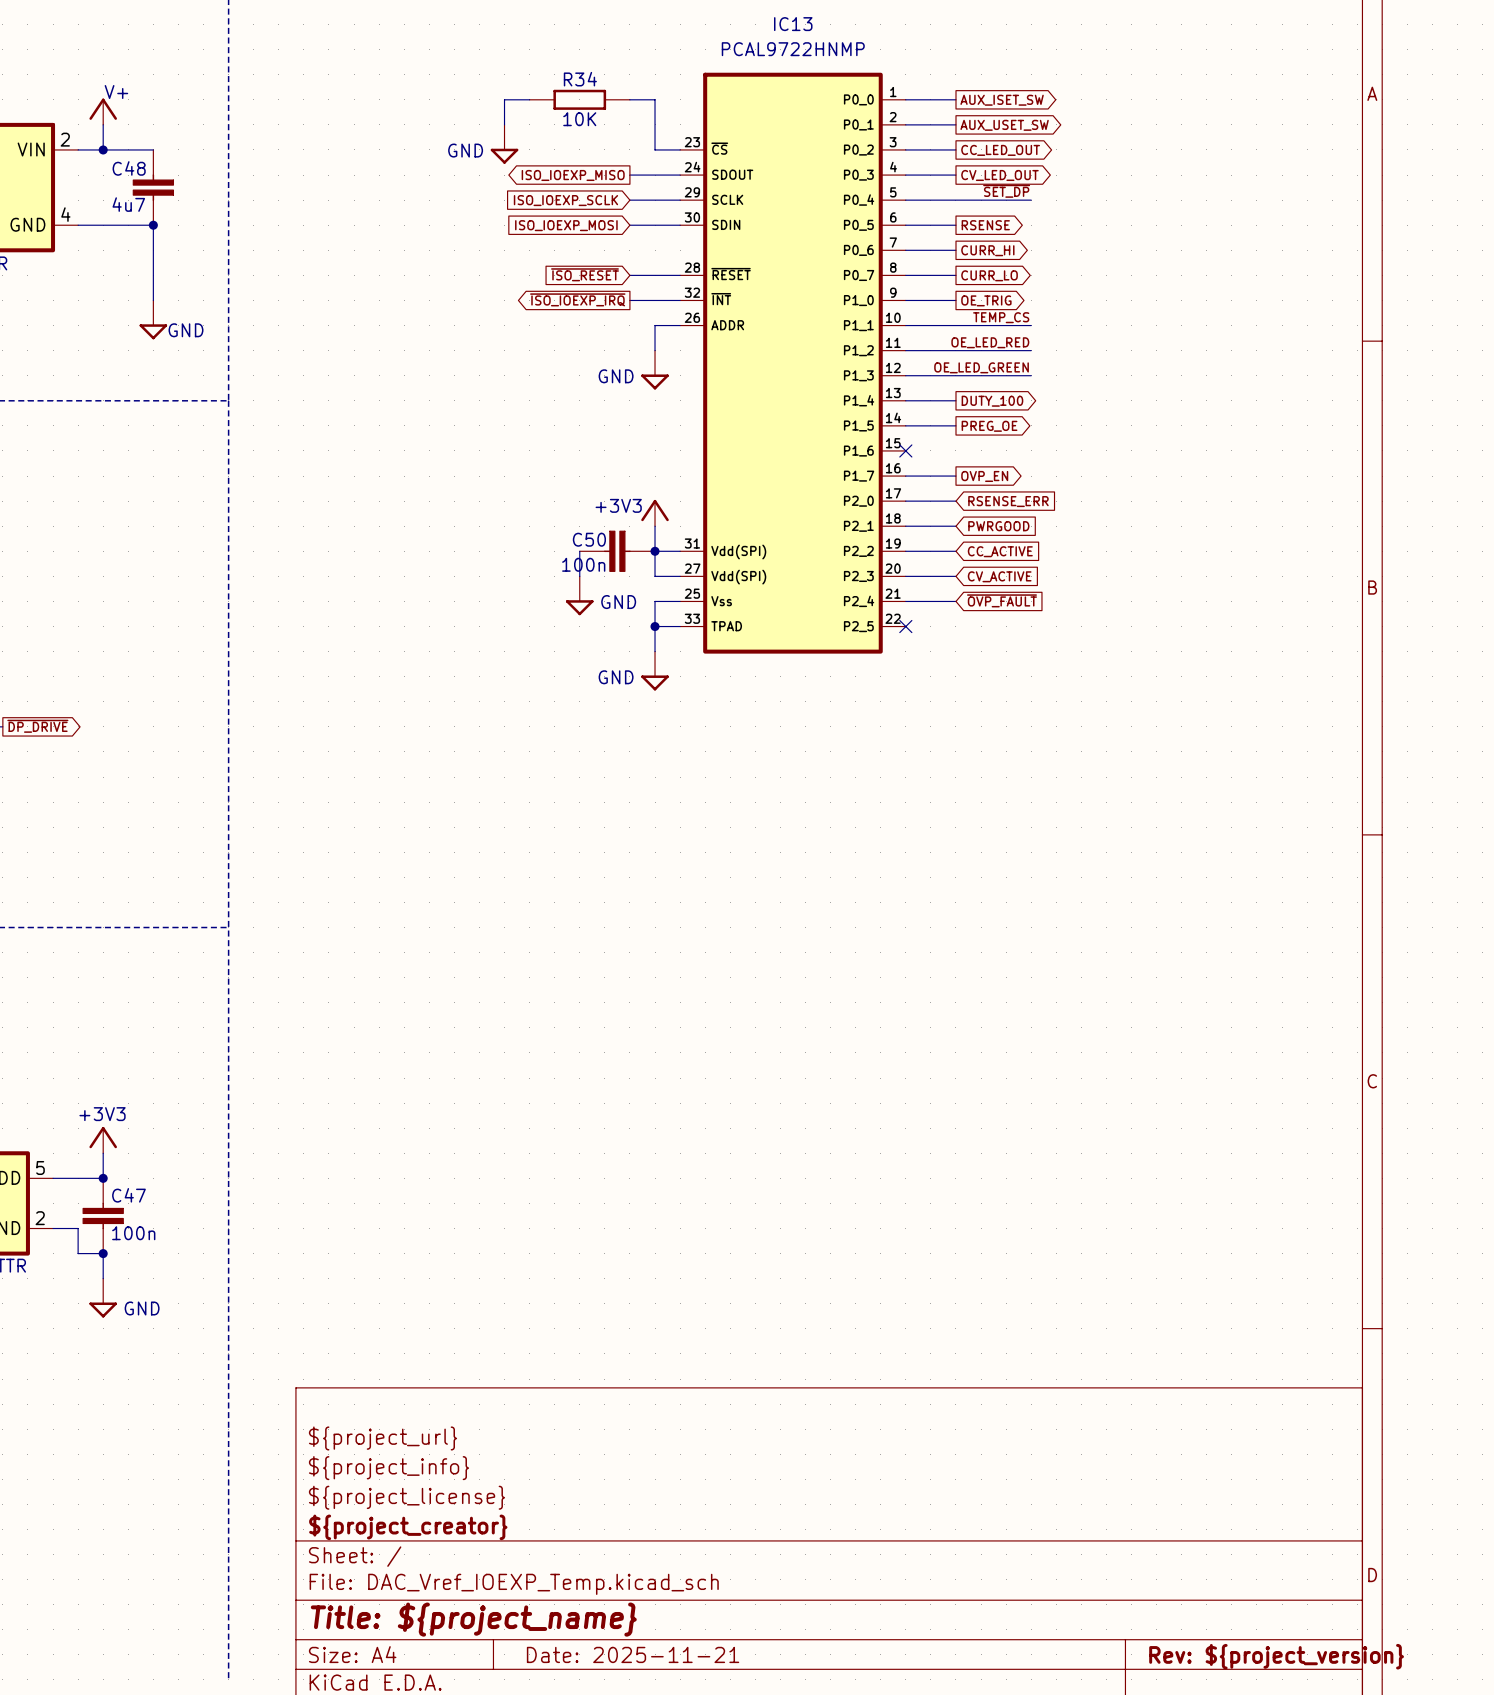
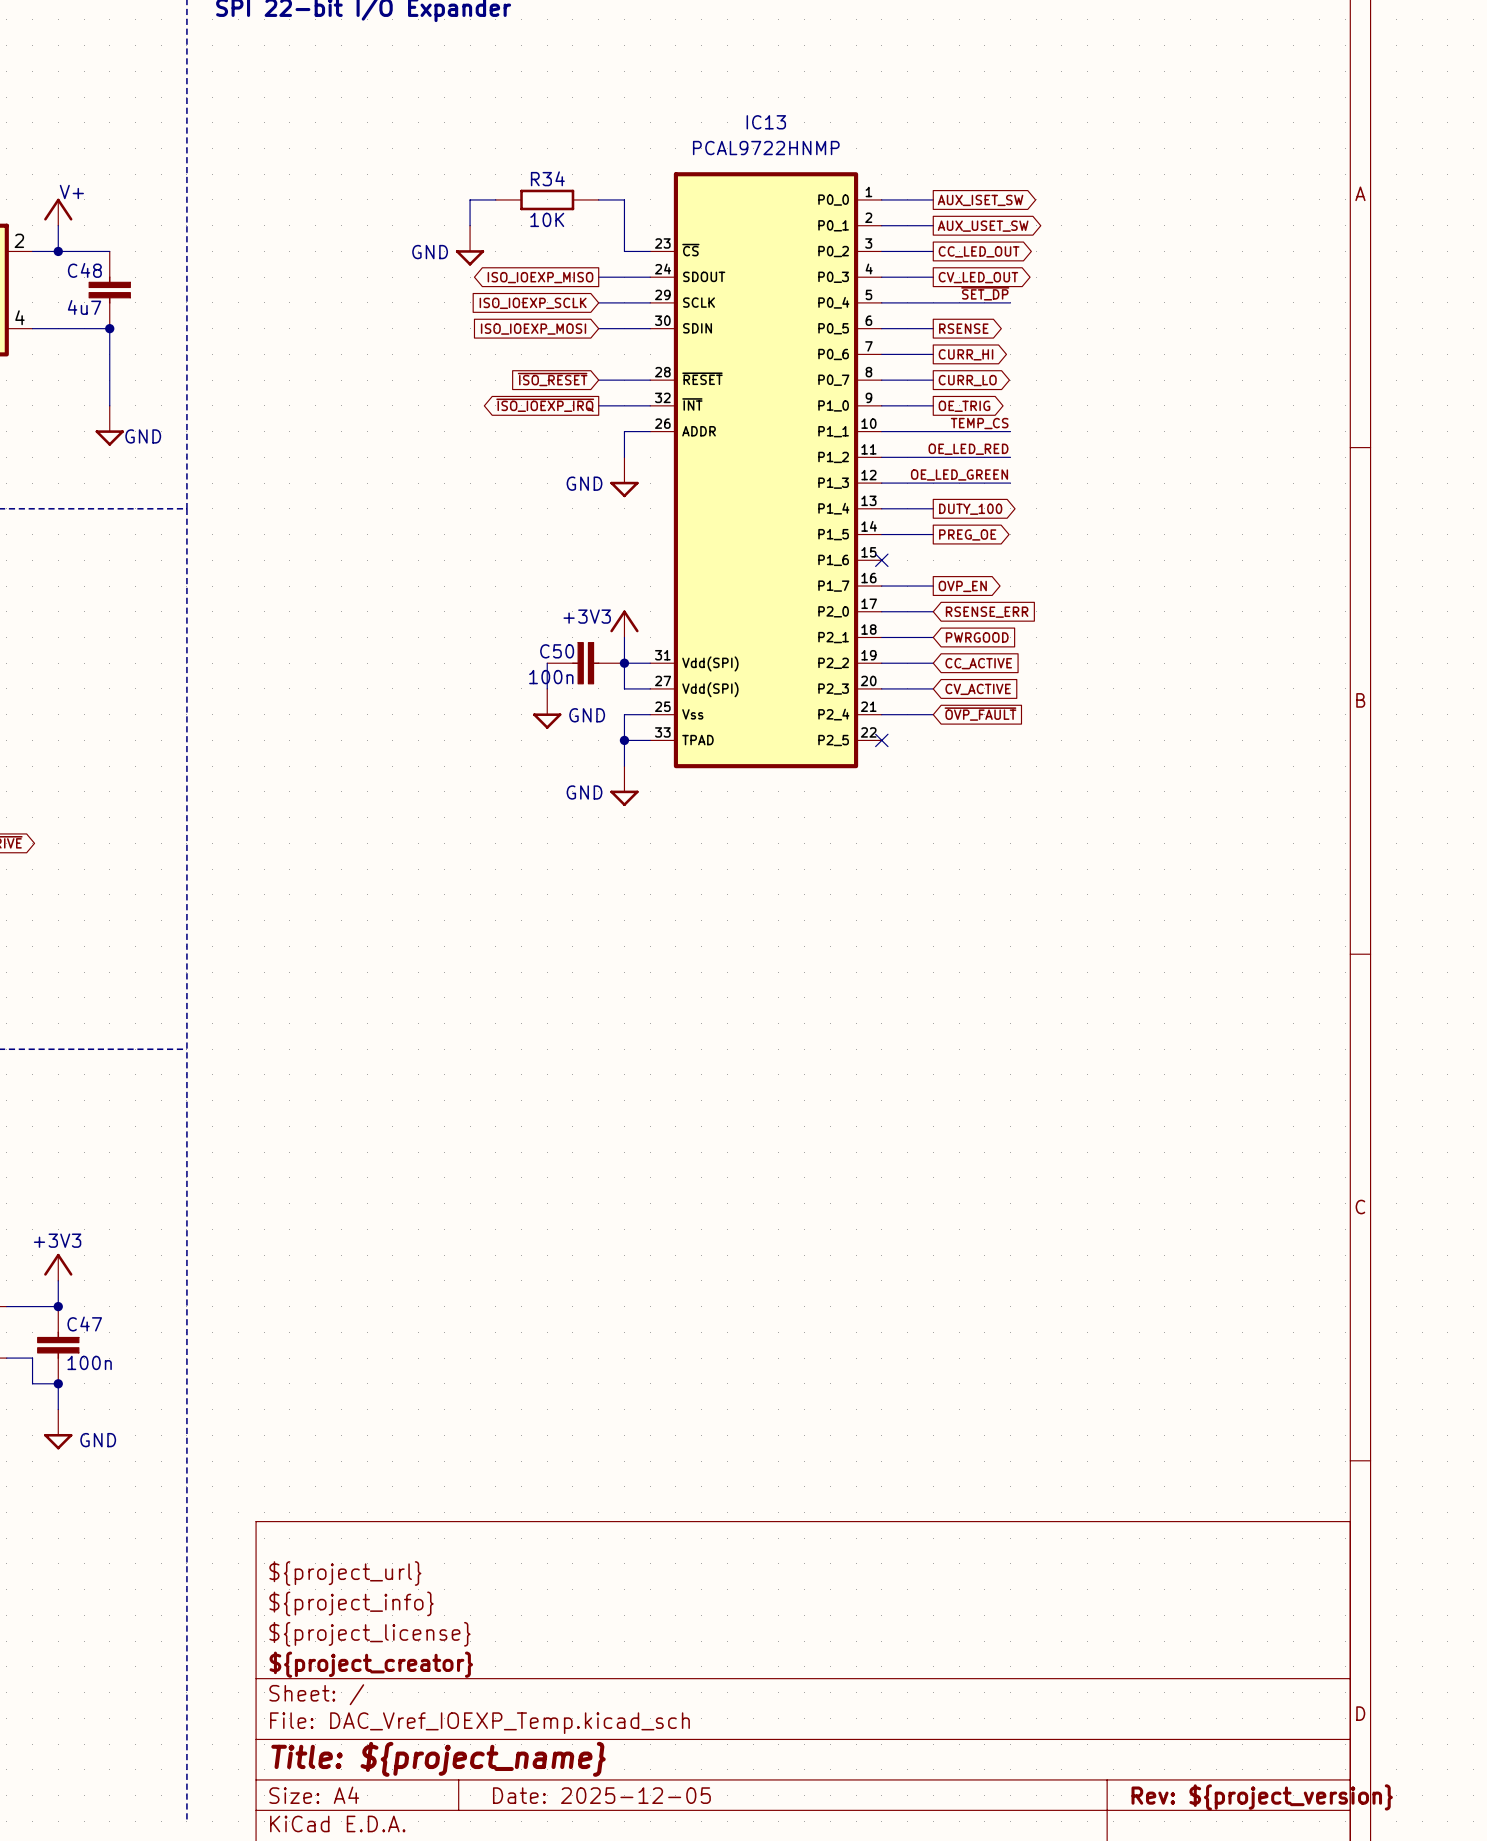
title block: Date: 2025-11-21 (633, 1654) -> Date: 2025-12-05 (601, 1795)

